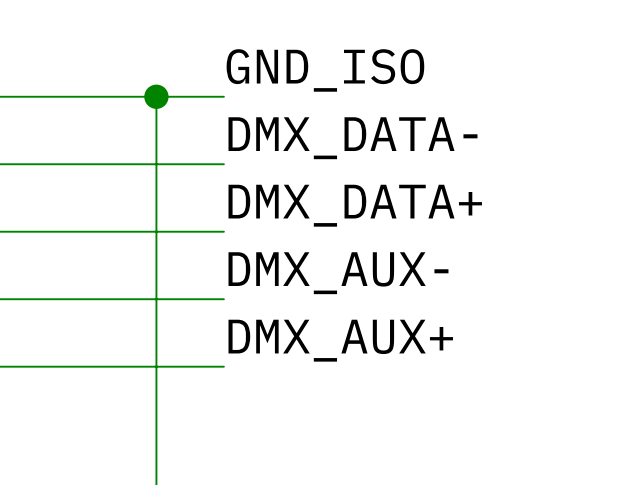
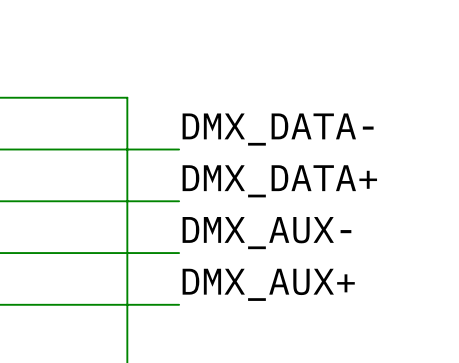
label: GND_ISO (325, 70) -> none
wire: (156, 96) (223, 96) -> none
junction: (156, 96) -> none

